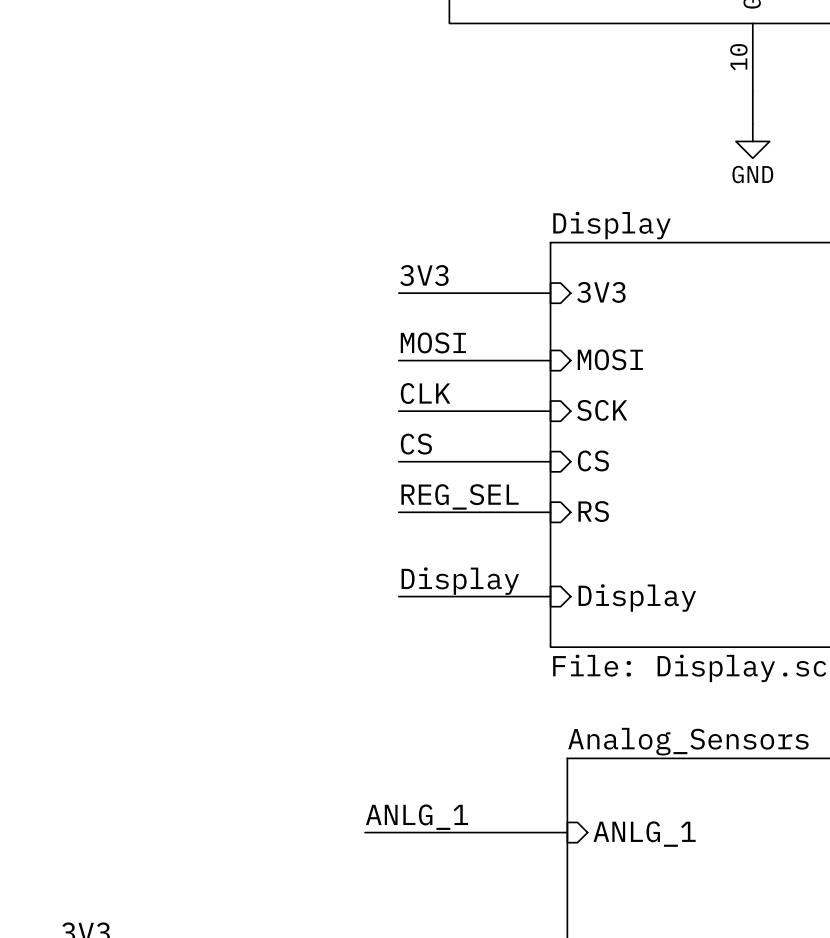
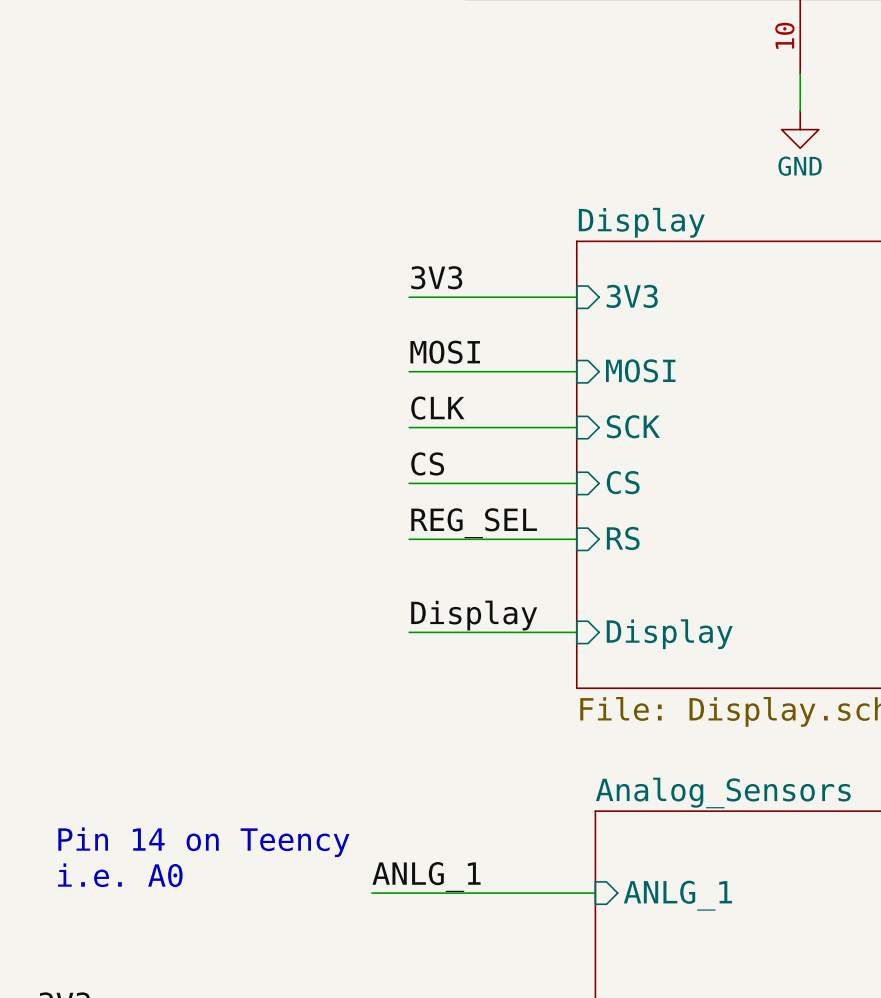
text: none -> Pin 14 on Teency (203, 842)
text: none -> i.e. A0 (120, 875)

